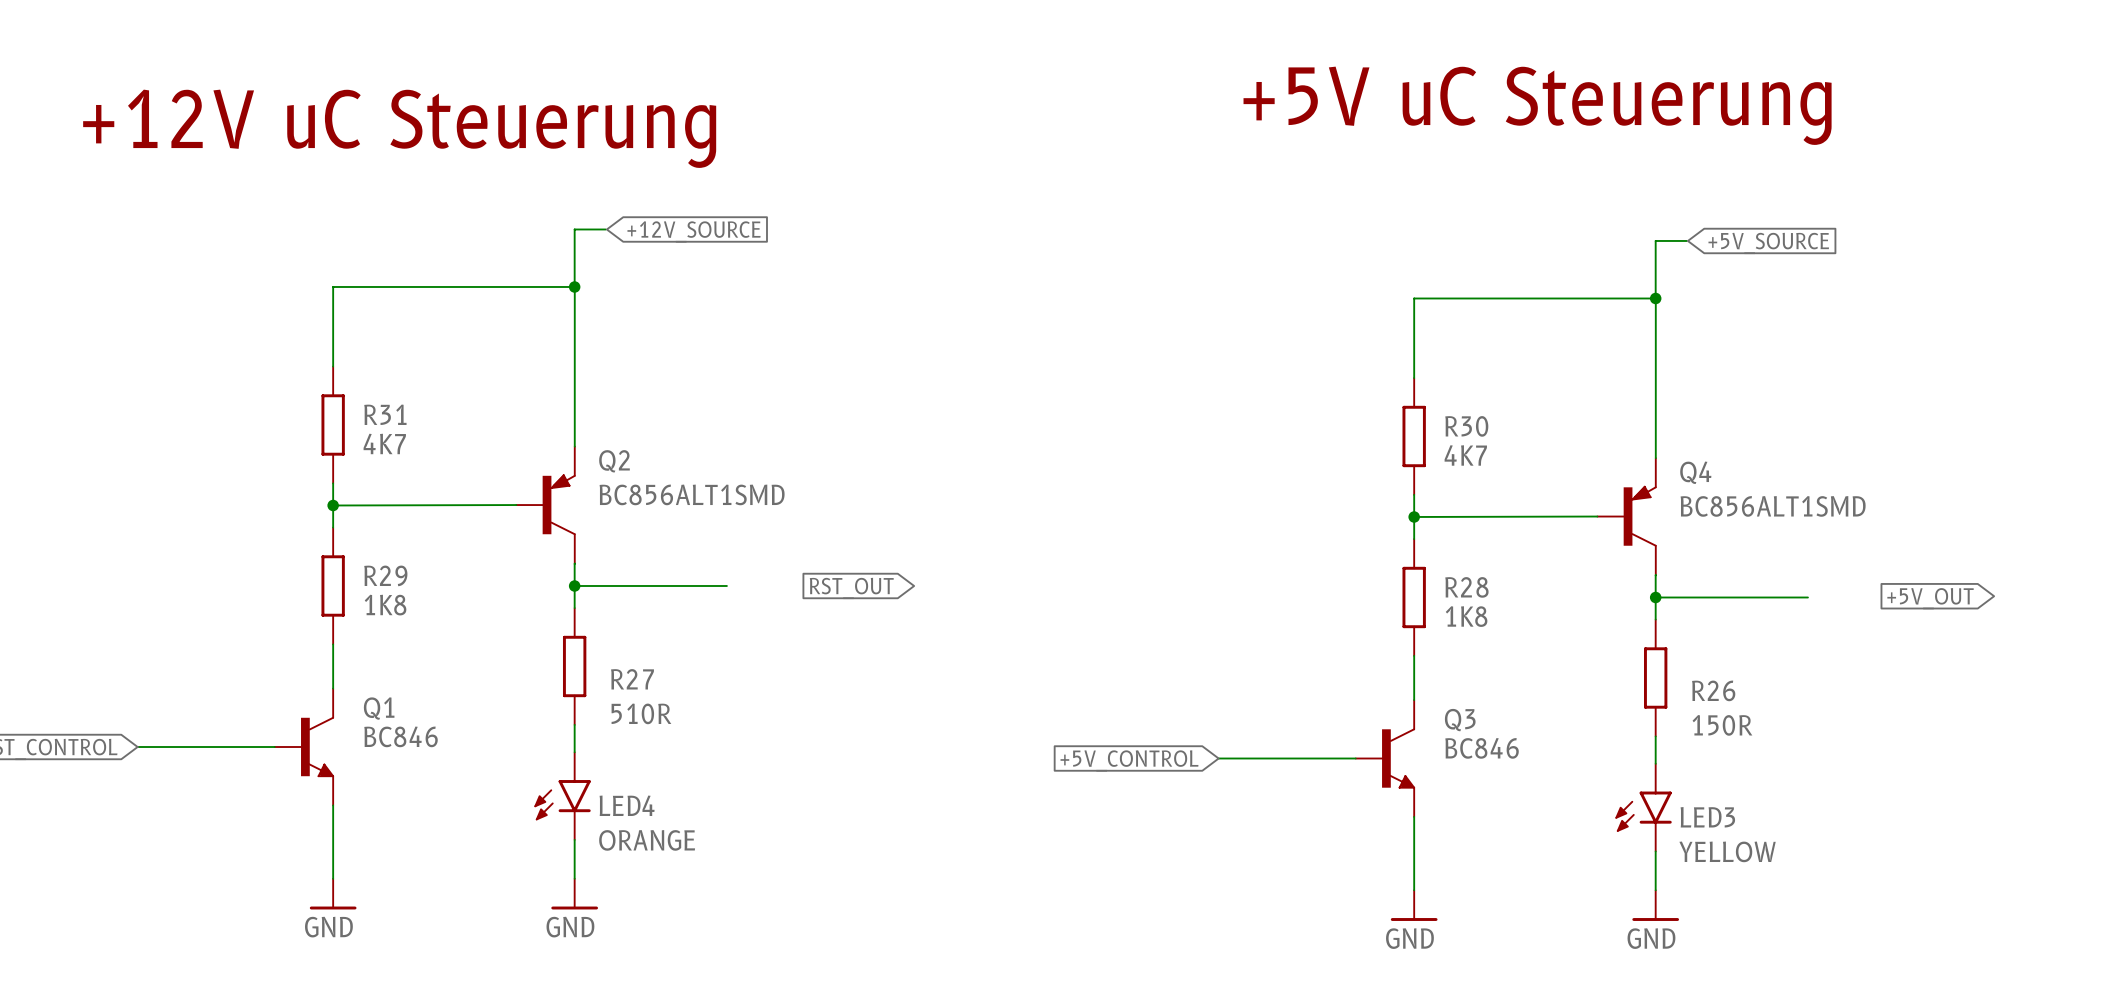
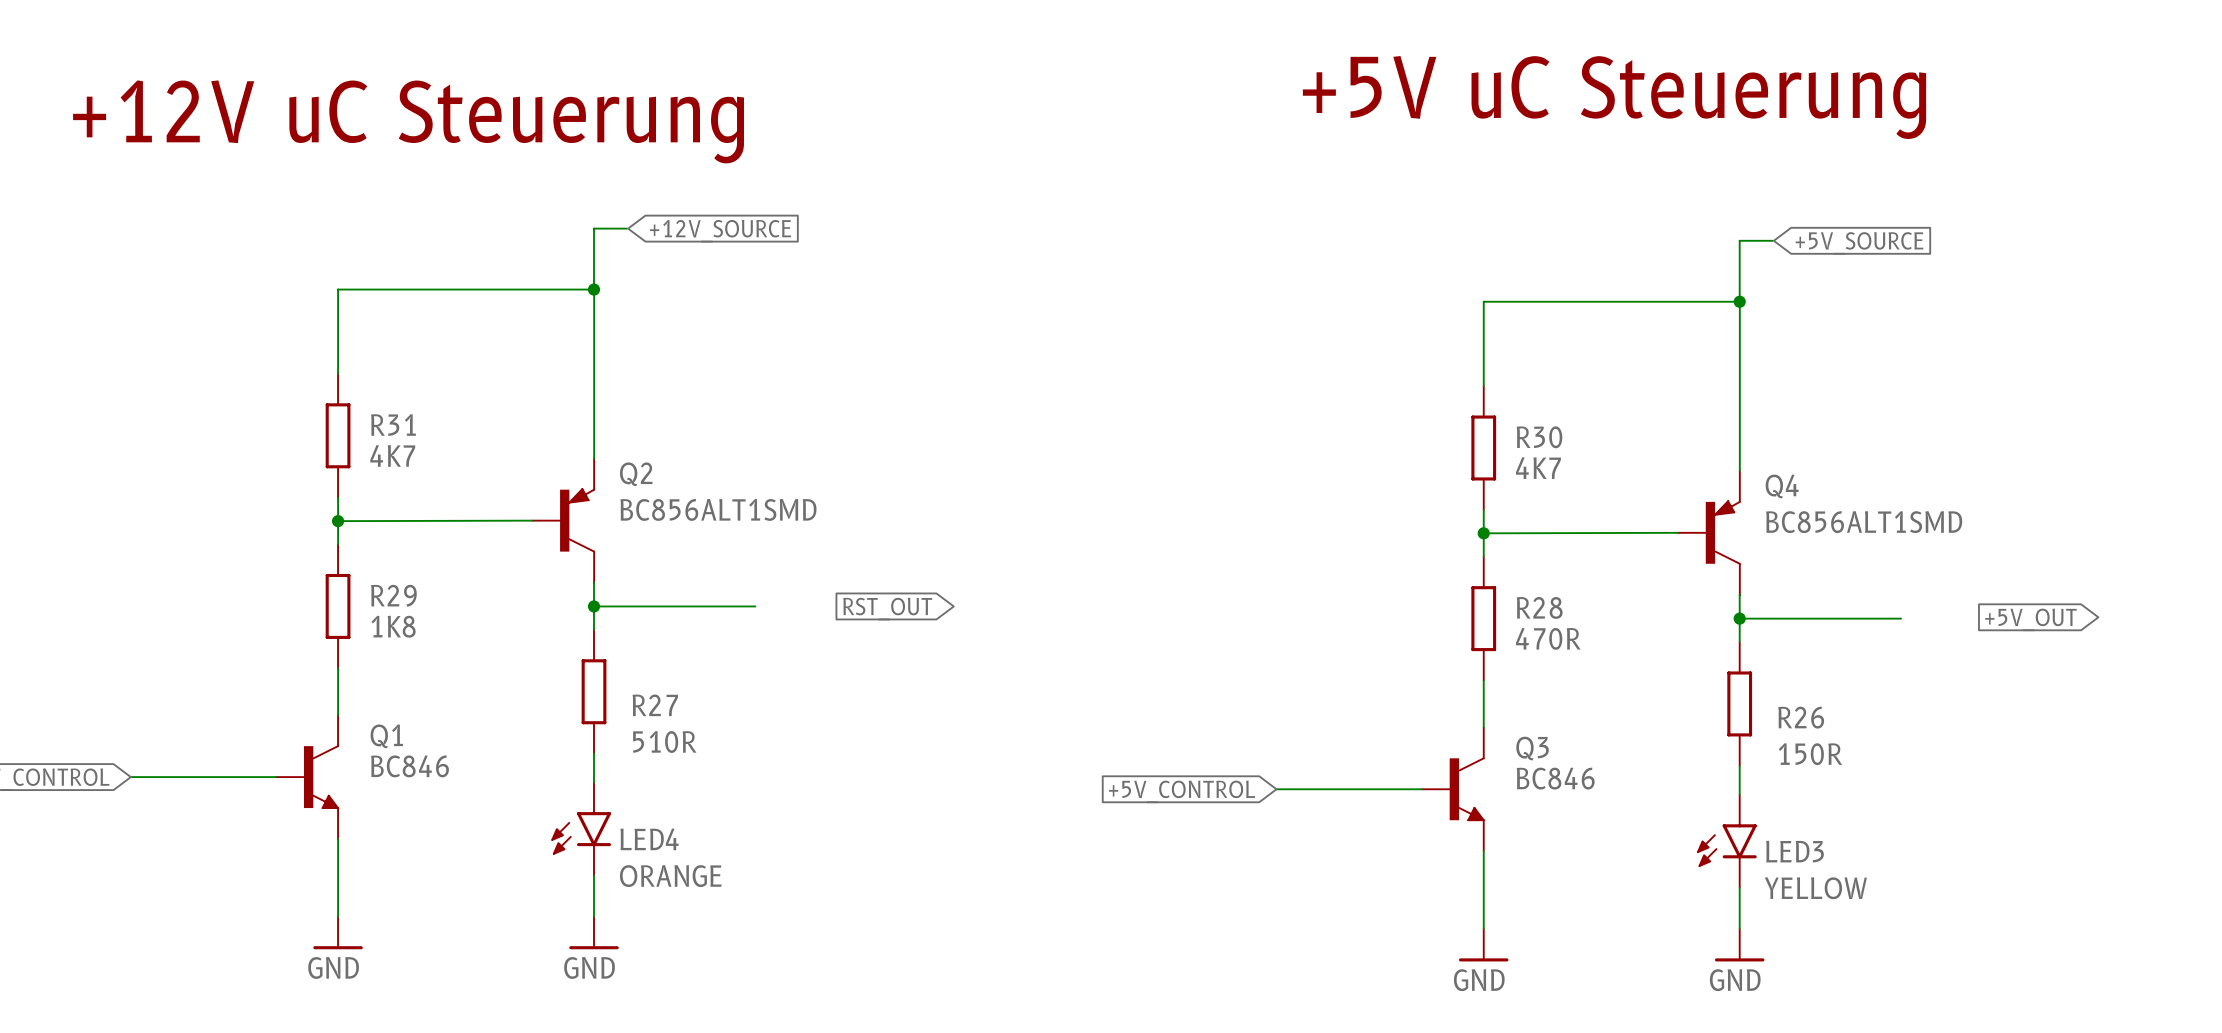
R28 value: 1K8 (1466, 616) -> 470R (1548, 638)

